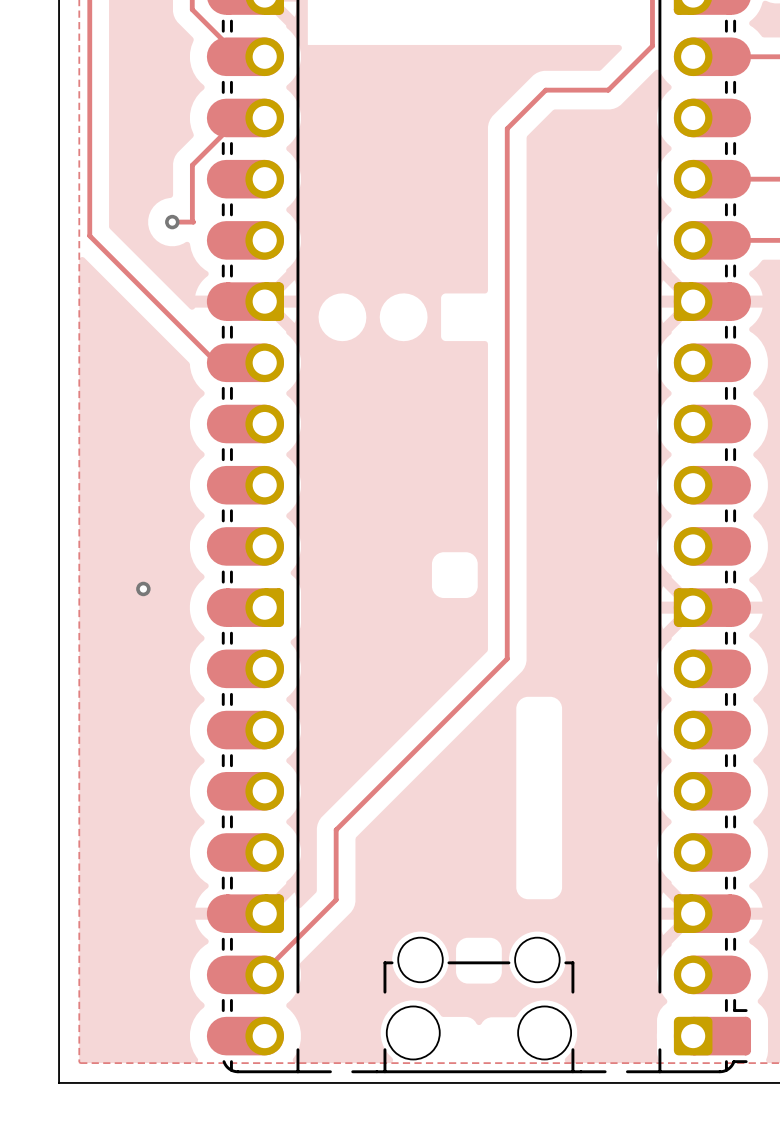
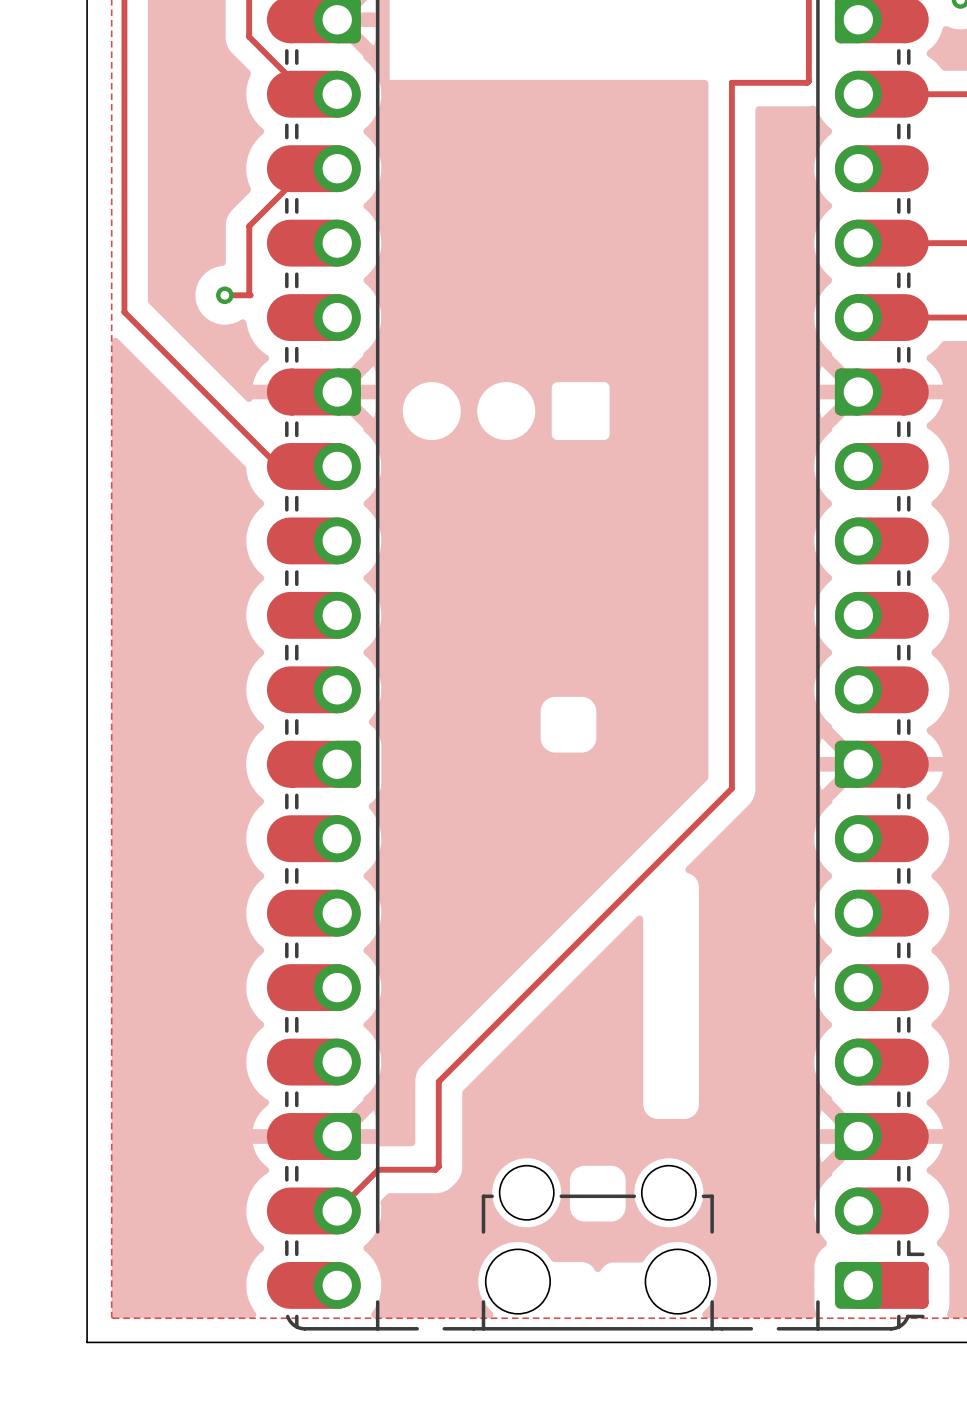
track: (651, 47) (608, 90) (545, 90) (507, 128) (507, 658) (336, 829) (336, 899) (264, 971) (264, 974) -> (807, 82) (731, 82) (731, 788) (438, 1081) (438, 1166) (435, 1169) (378, 1169) (337, 1210)
via: (143, 588) -> none

